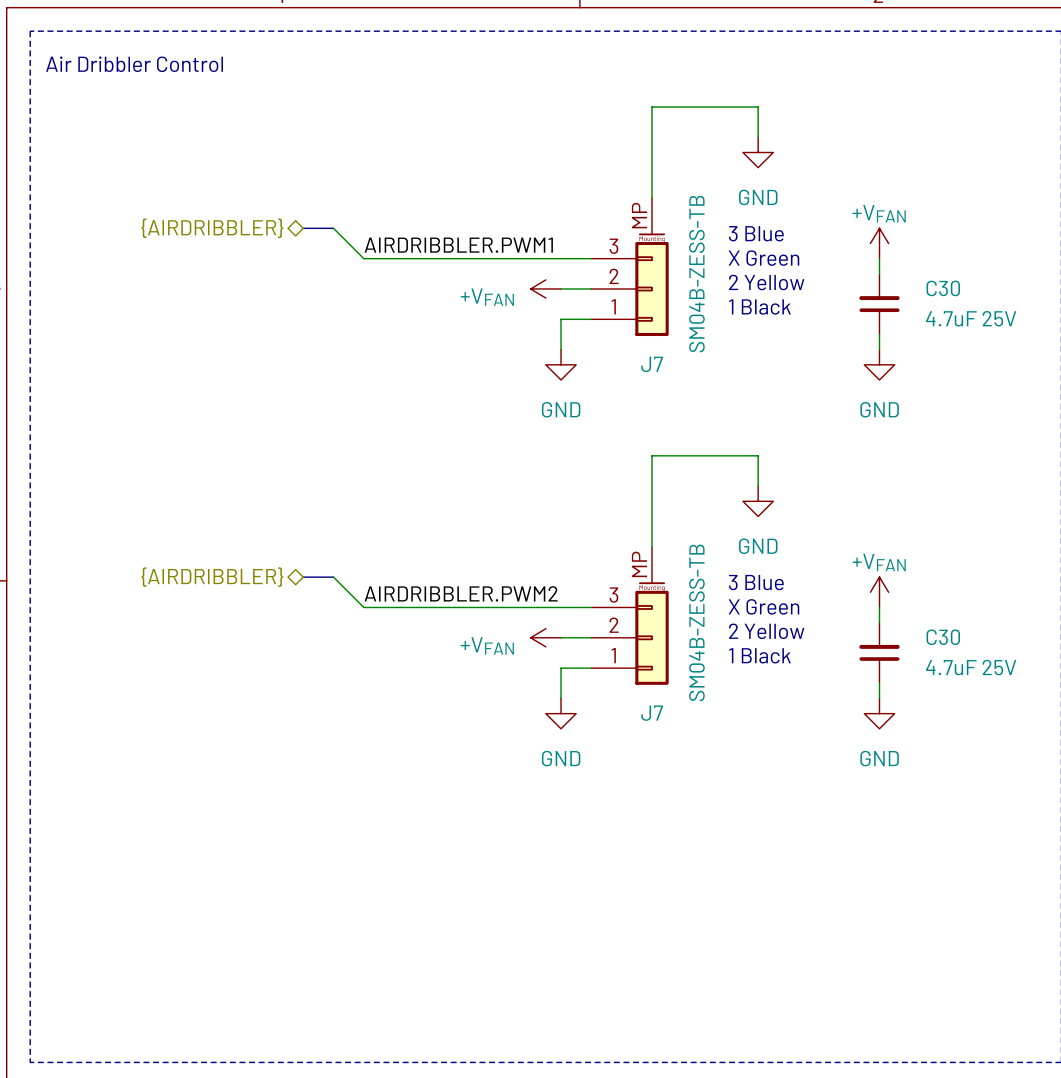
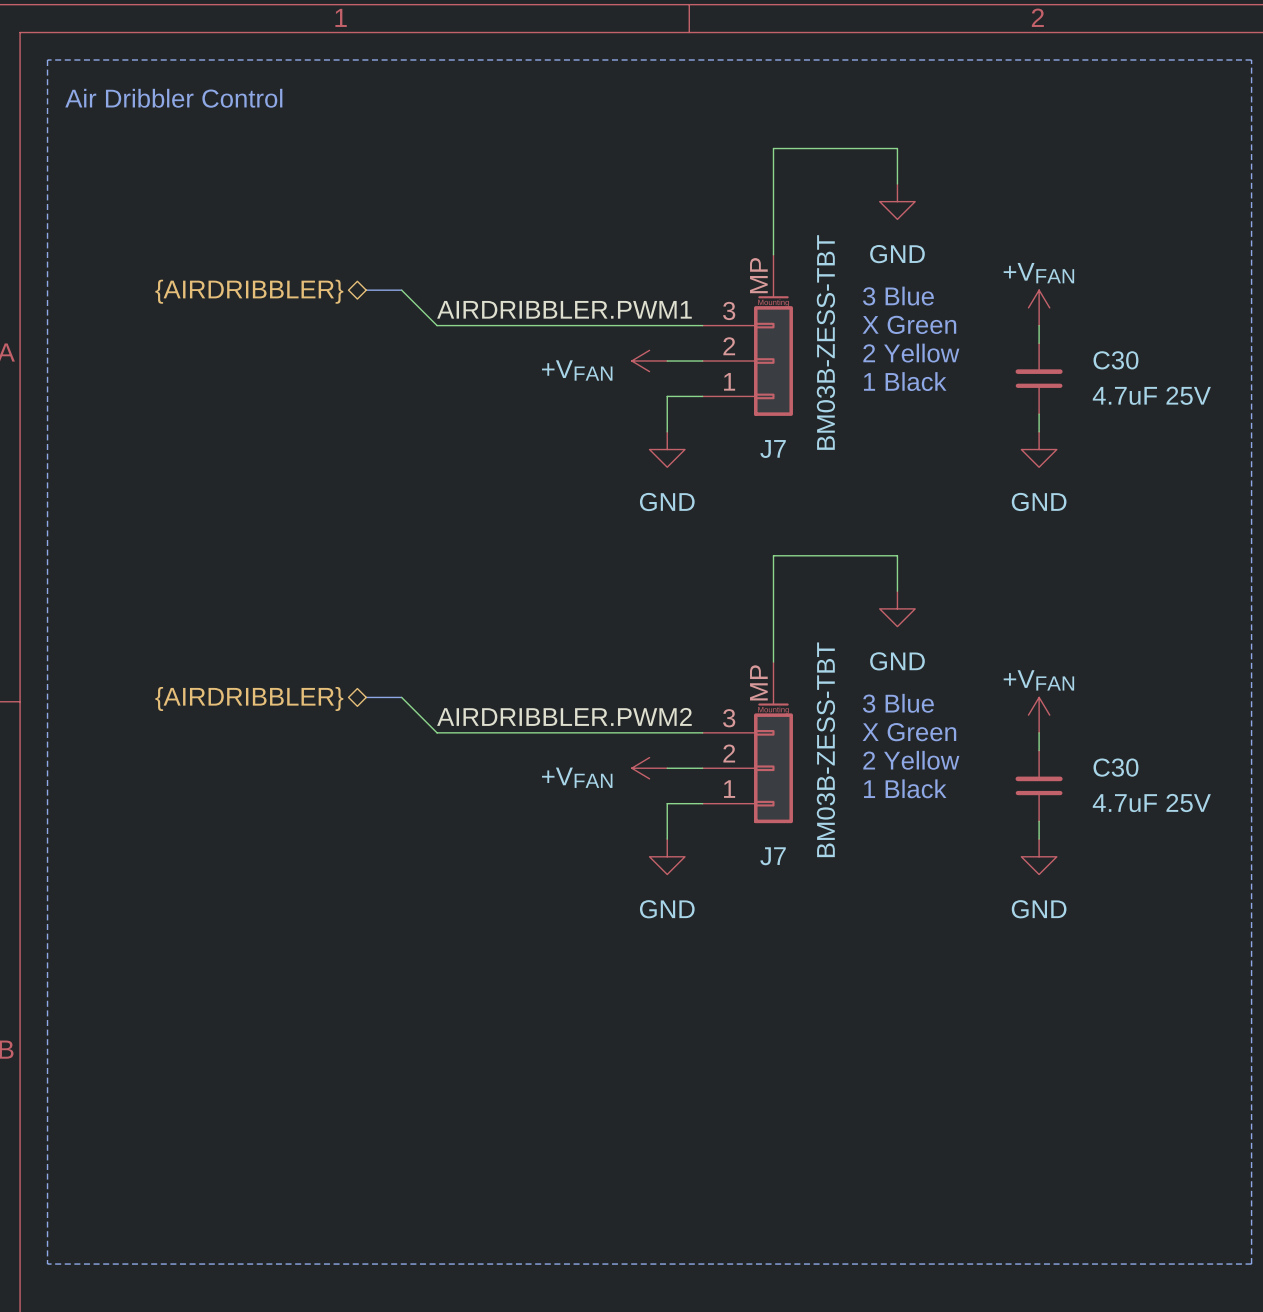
J7 value: SM04B-ZESS-TB (696, 274) -> BM03B-ZESS-TBT (825, 342)
J7 value: SM04B-ZESS-TB (696, 622) -> BM03B-ZESS-TBT (825, 749)

